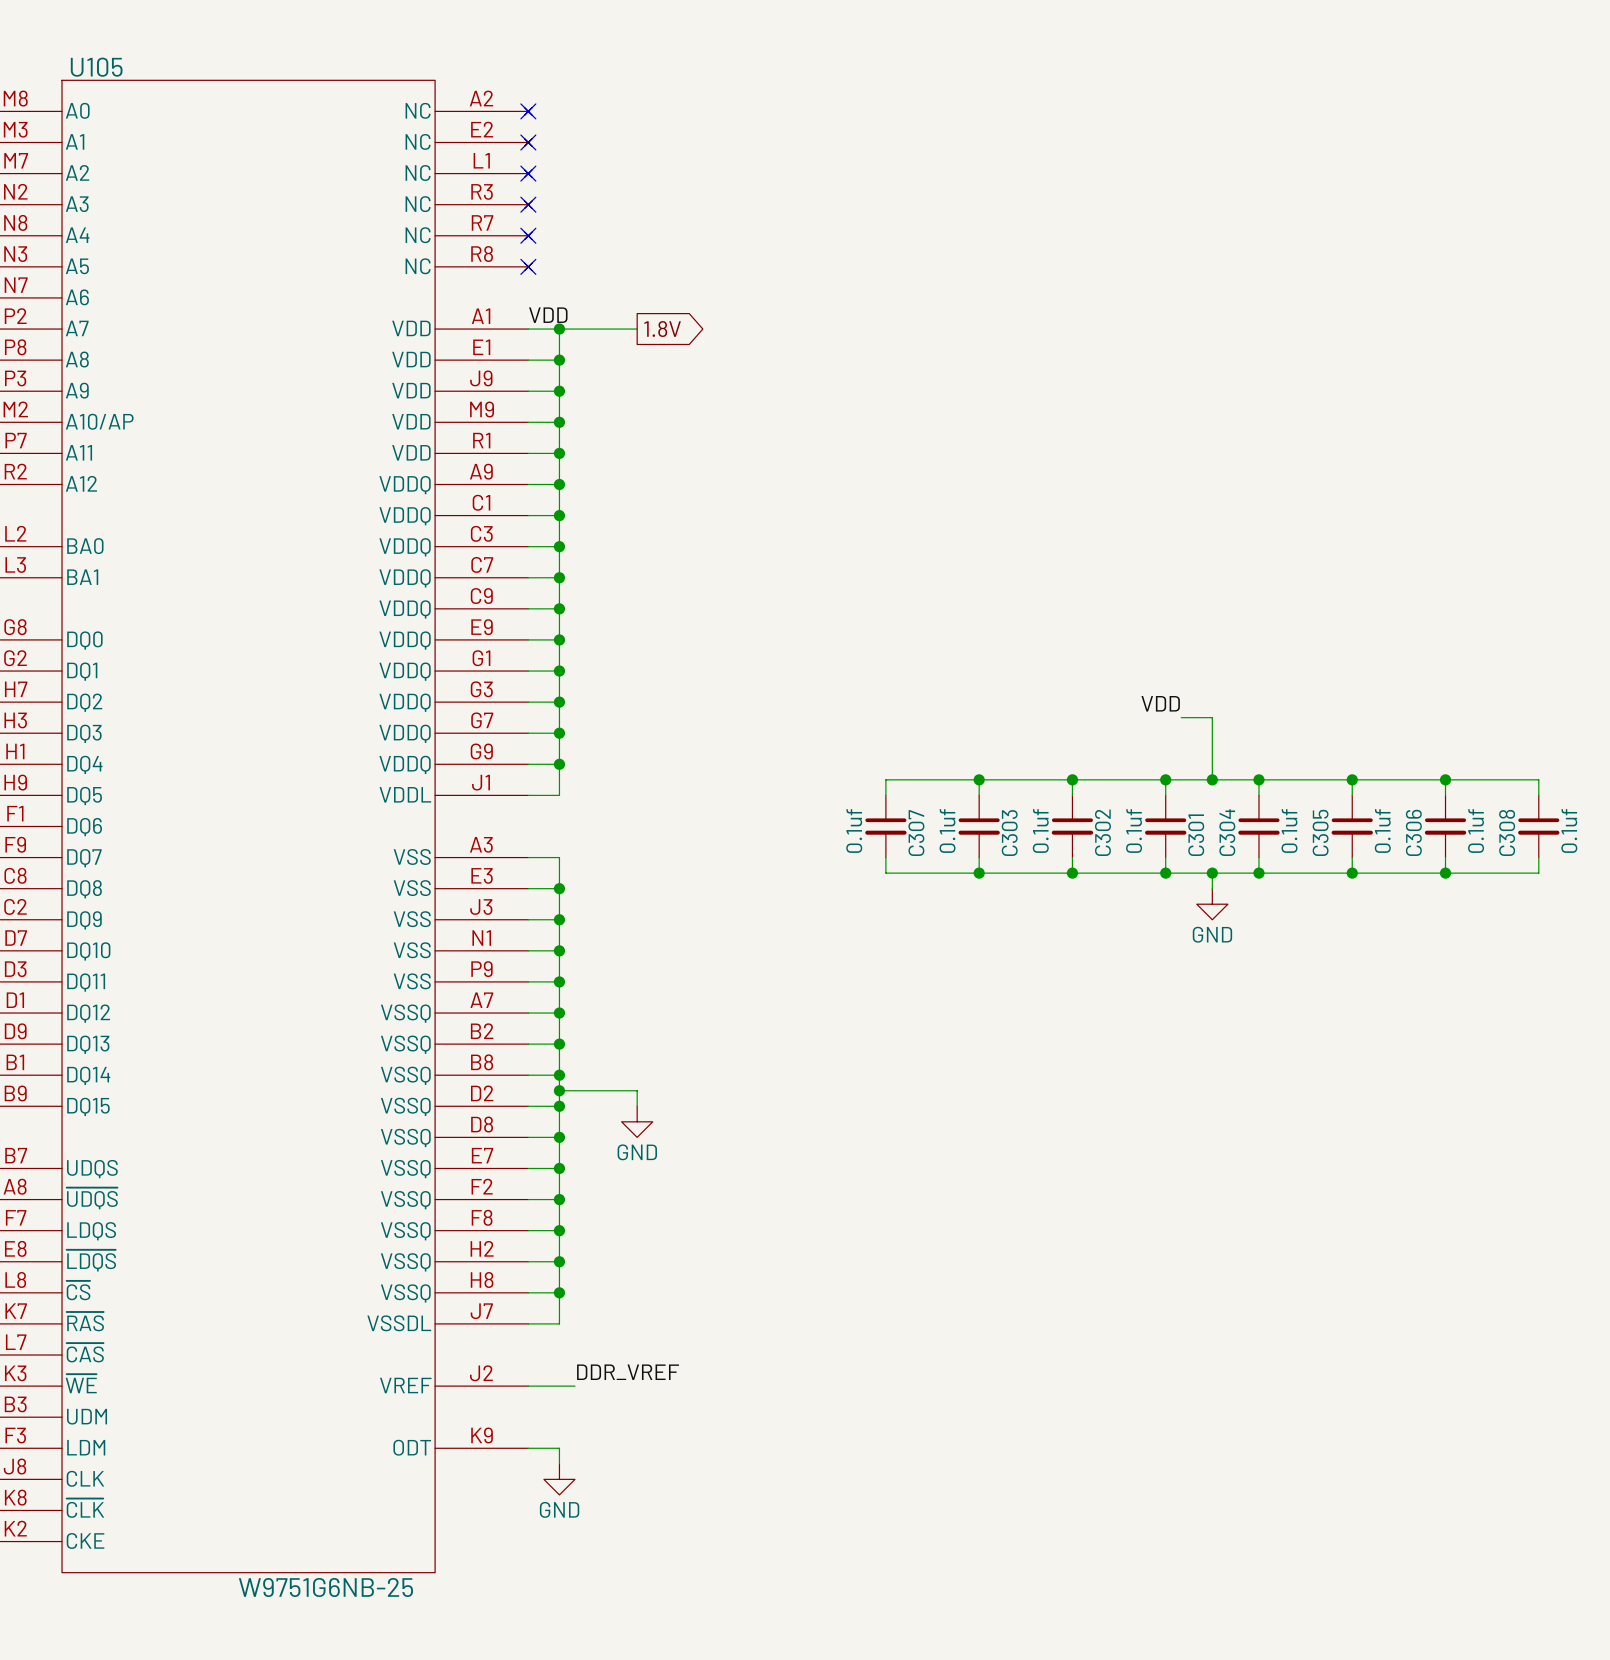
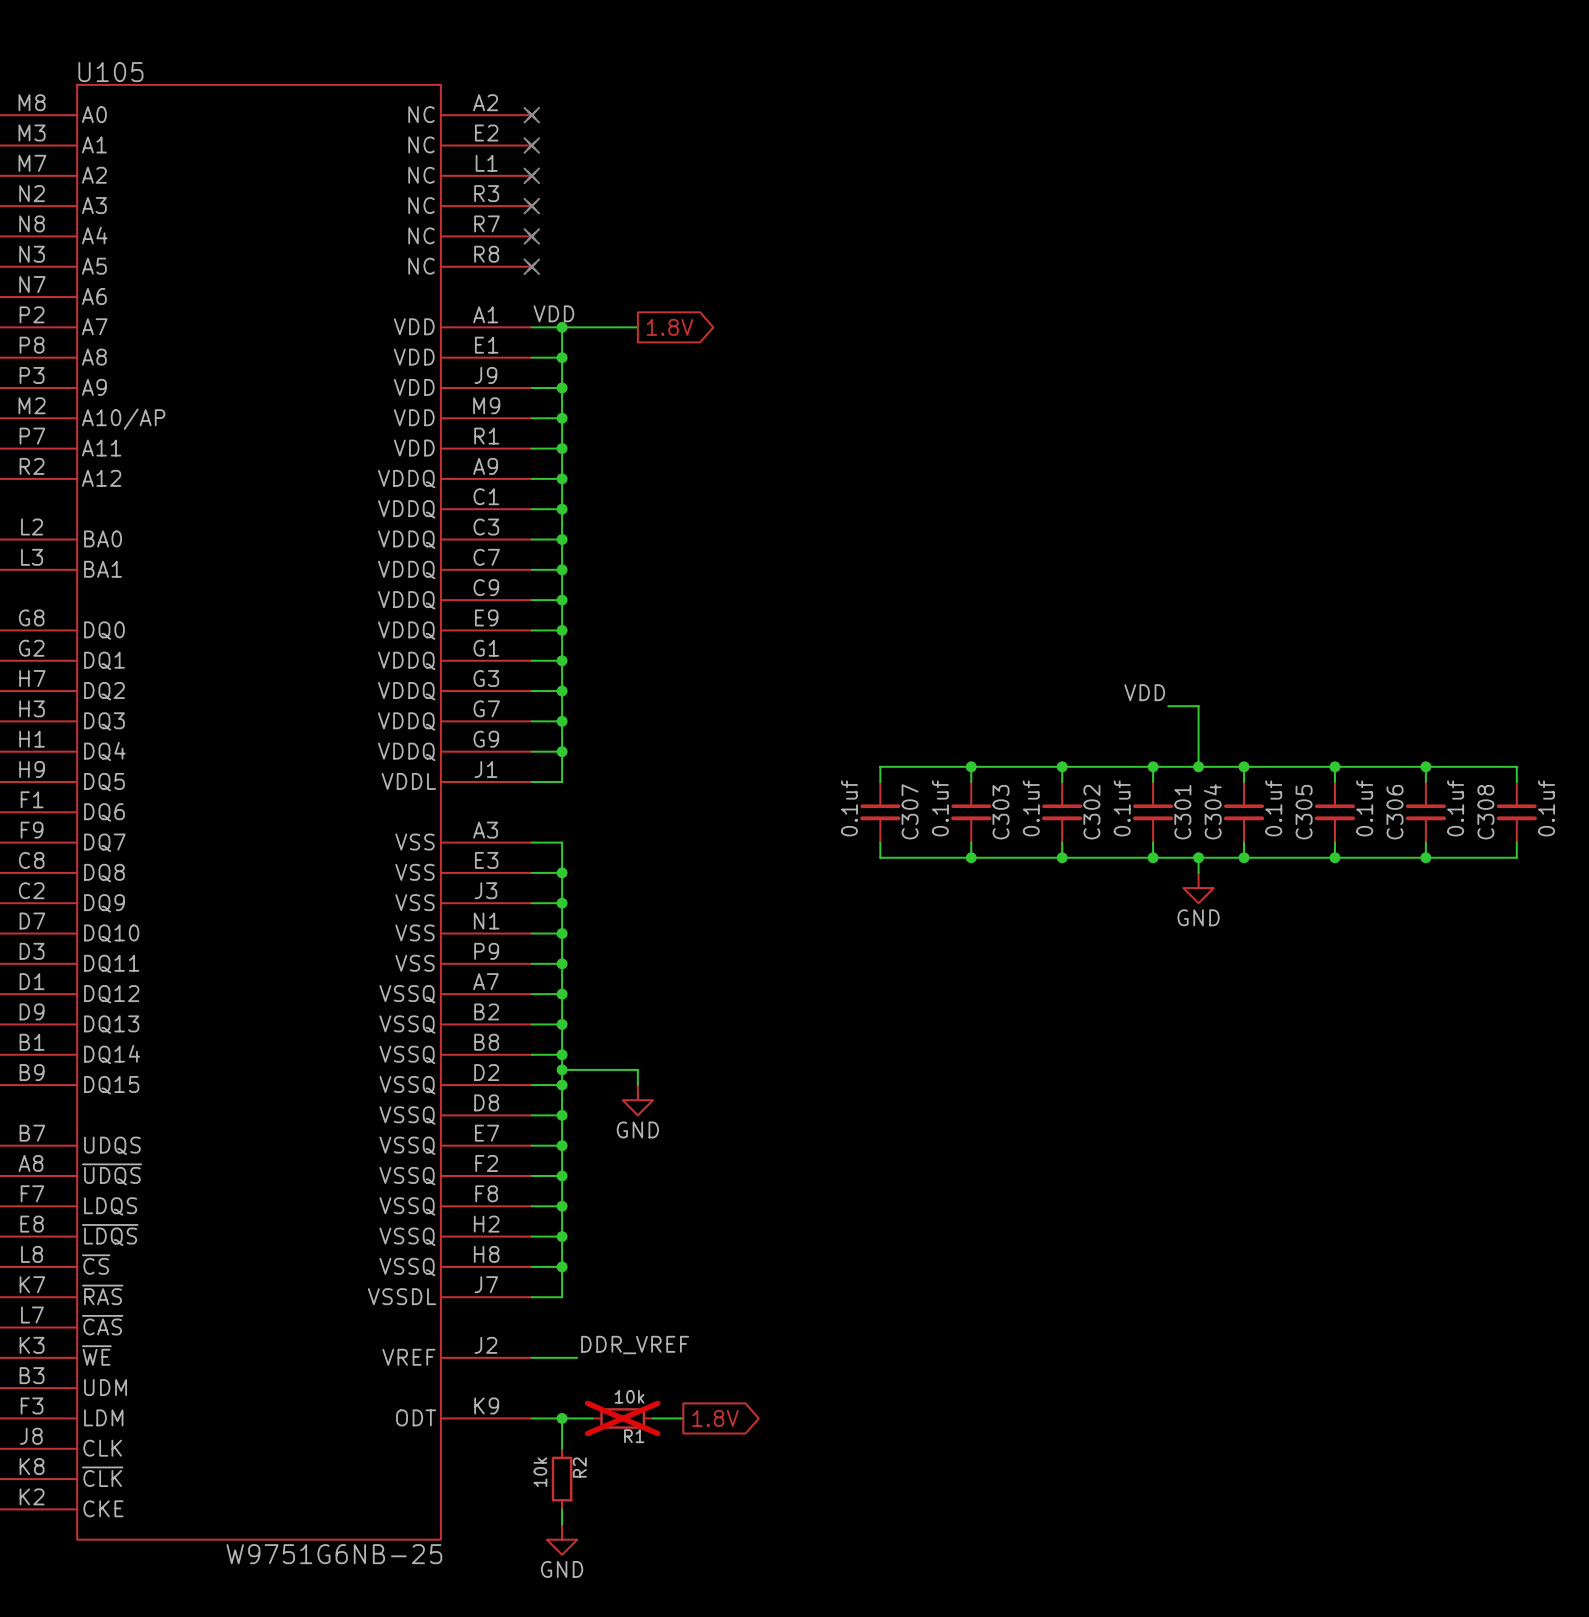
wire: none -> (562, 1418) (592, 1418)
junction: none -> (562, 1418)
R1: none -> 10k (622, 1418)
wire: none -> (653, 1418) (683, 1418)
global label: none -> 1.8V (715, 1418)
power symbol position: GND (559, 1479) -> GND (562, 1539)
R2: none -> 10k (562, 1479)
wire: none -> (562, 1509) (562, 1524)

